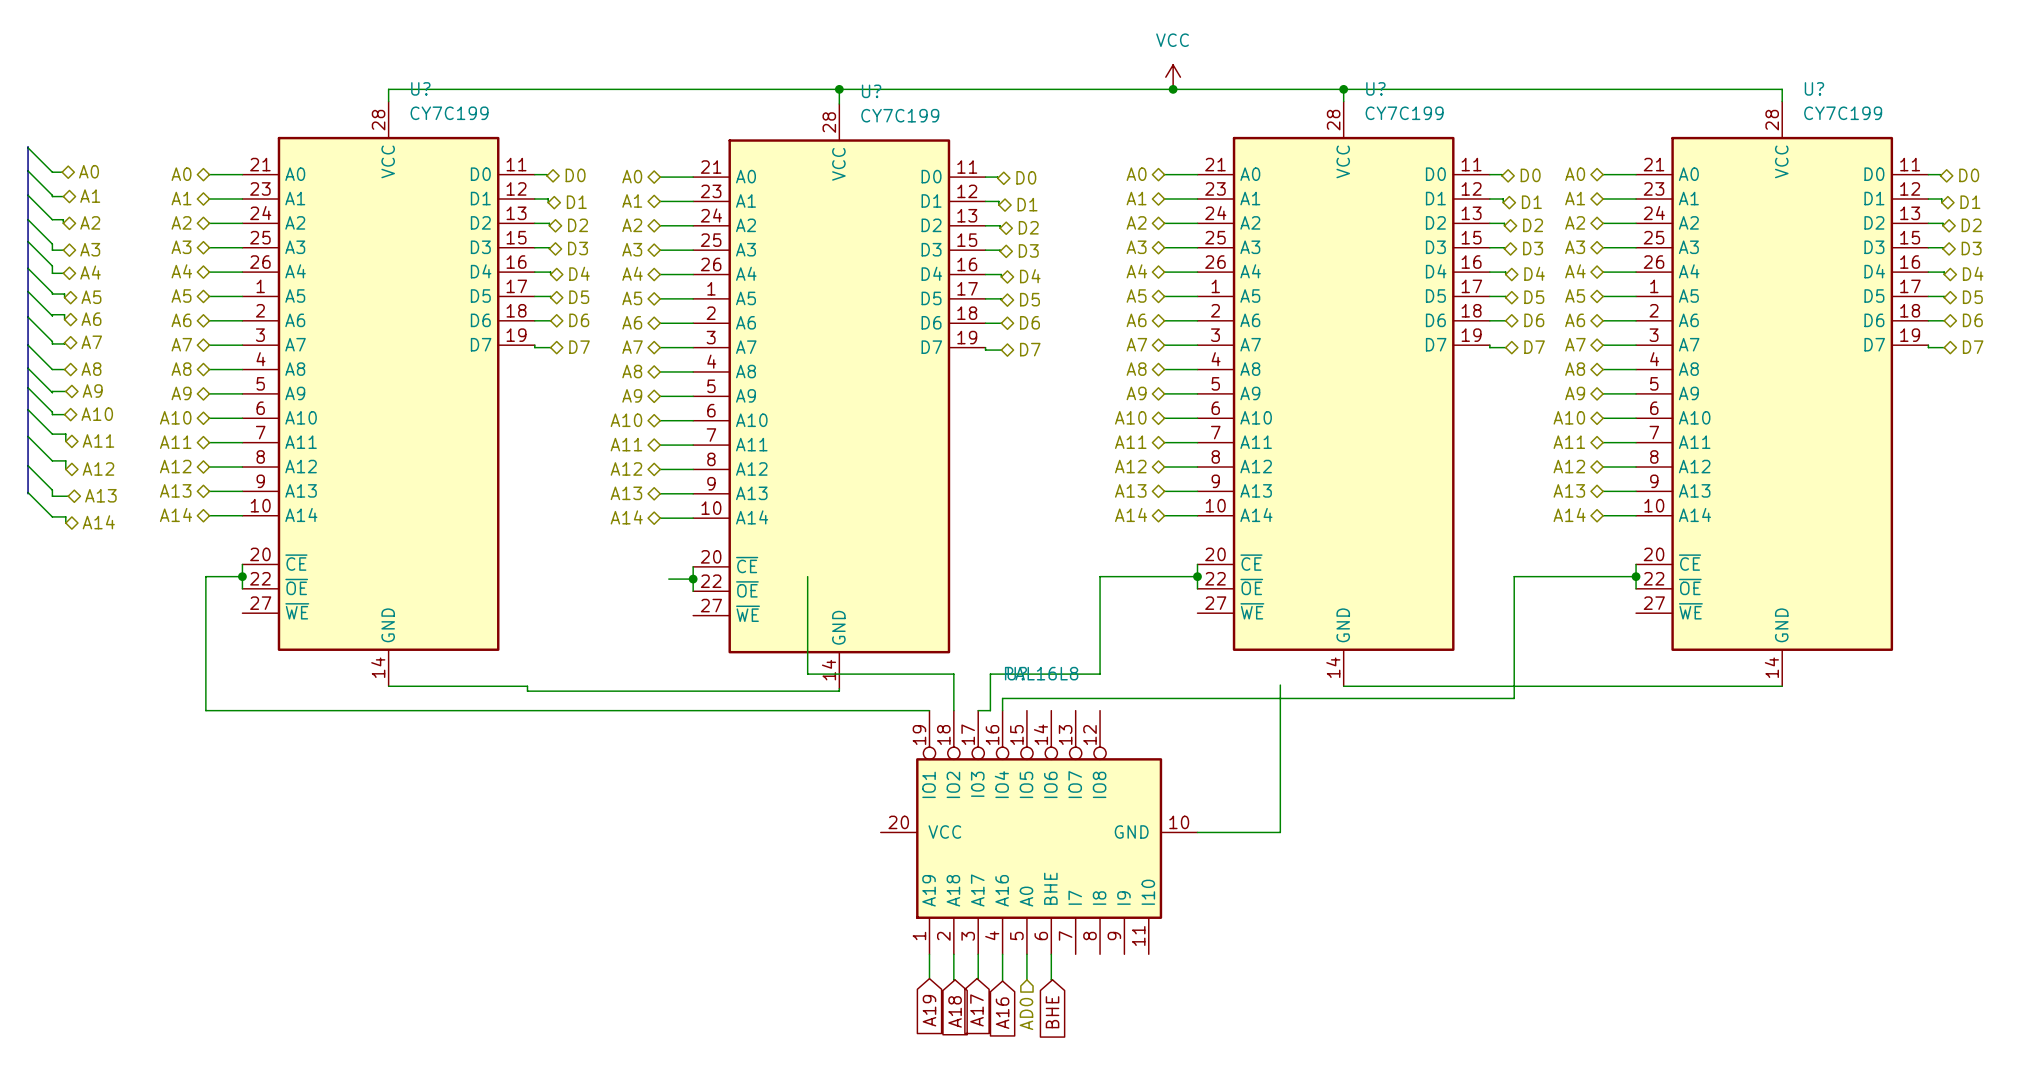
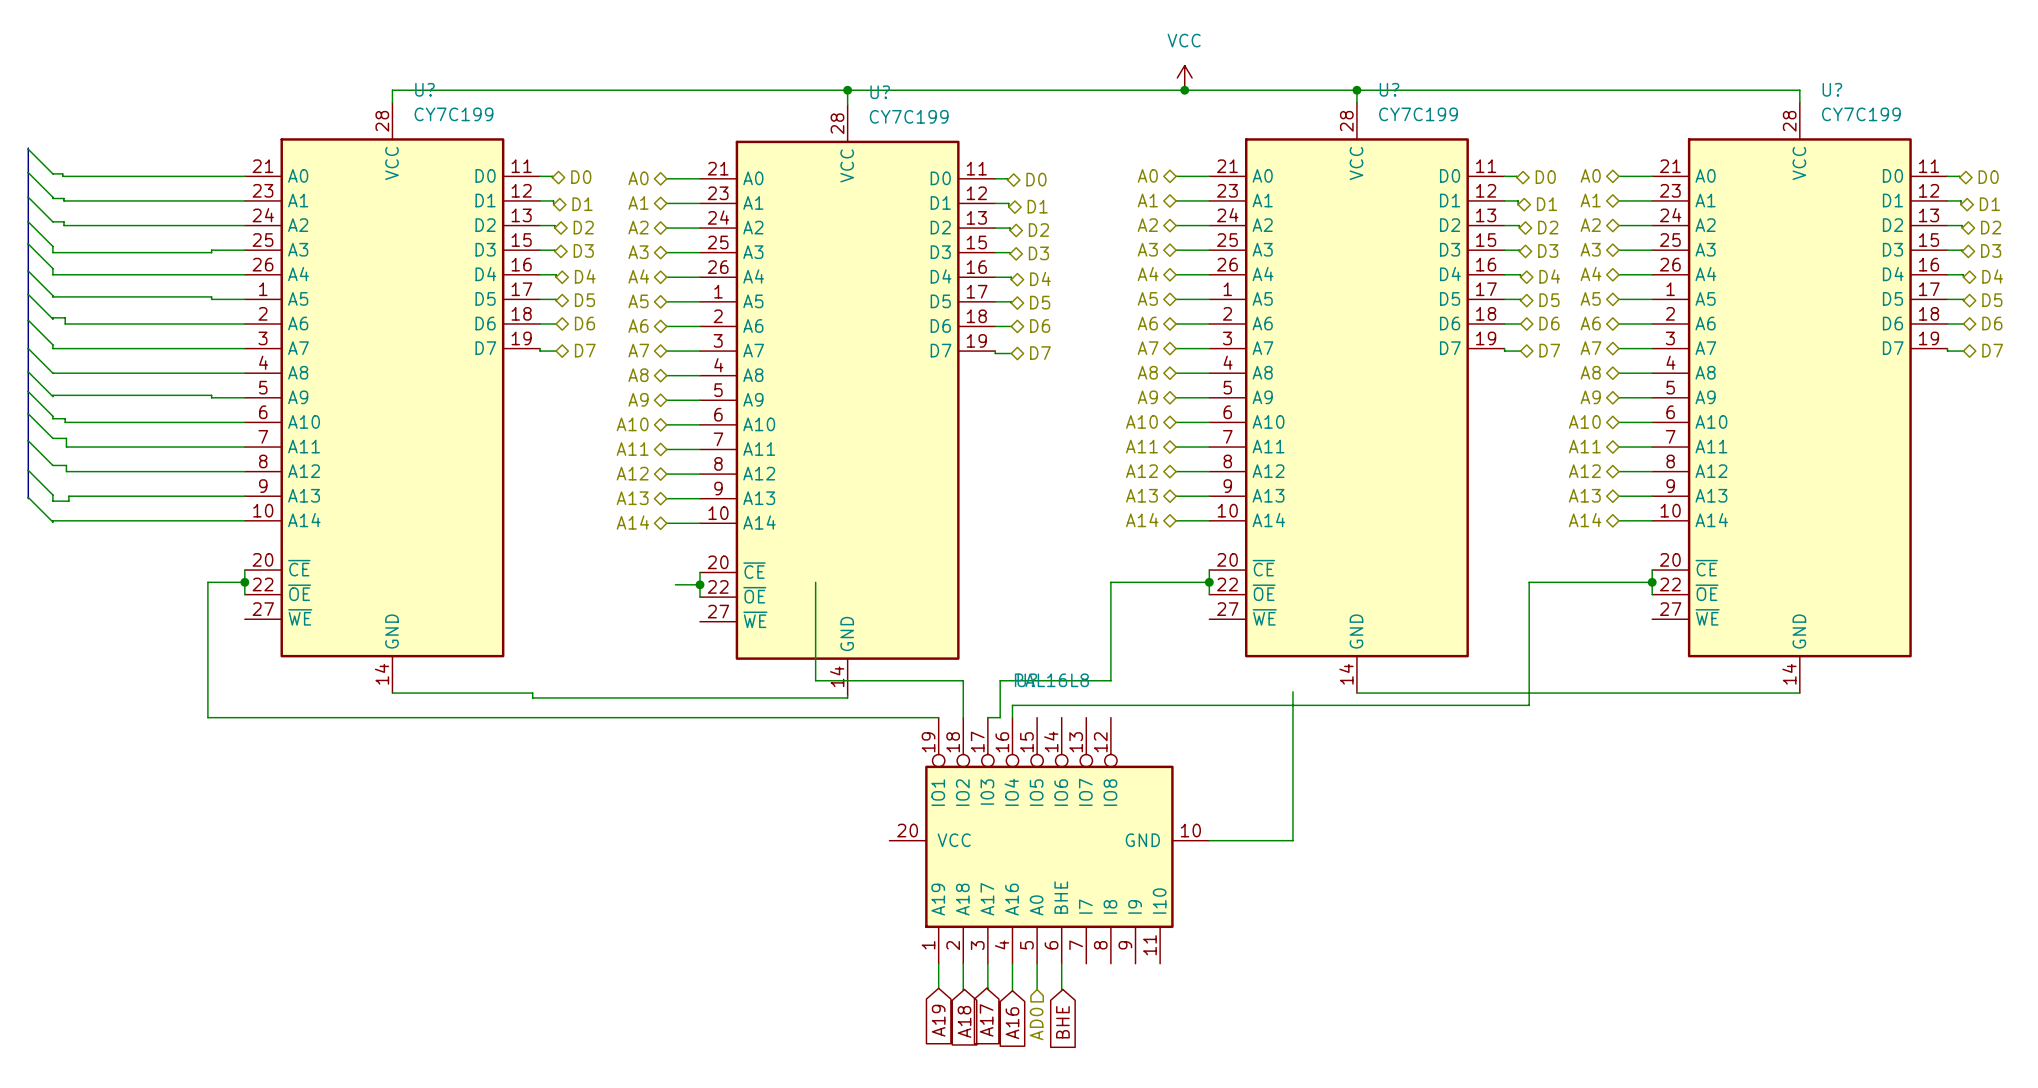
hierarchical label: A0 (89, 171) -> none
wire: none -> (62, 173) (62, 176) (211, 176)
hierarchical label: A0 (181, 174) -> none
wire: none -> (63, 198) (63, 200) (211, 200)
hierarchical label: A1 (90, 196) -> none
hierarchical label: A1 (181, 198) -> none
hierarchical label: A2 (90, 222) -> none
hierarchical label: A2 (181, 222) -> none
wire: none -> (63, 225) (211, 225)
hierarchical label: A3 (181, 247) -> none
wire: none -> (211, 250) (211, 252) (63, 252)
hierarchical label: A3 (90, 249) -> none
hierarchical label: A4 (181, 271) -> none
wire: (52, 272) (63, 273) -> (52, 274) (211, 274)
hierarchical label: A4 (90, 272) -> none
wire: (64, 294) (64, 297) -> (65, 296) (211, 296) (211, 299)
hierarchical label: A5 (181, 296) -> none
hierarchical label: A5 (91, 297) -> none
wire: none -> (65, 322) (211, 323)
hierarchical label: A6 (91, 319) -> none
hierarchical label: A6 (181, 320) -> none
wire: (64, 342) (52, 343) -> (211, 348) (52, 347)
hierarchical label: A7 (91, 342) -> none
hierarchical label: A7 (181, 344) -> none
wire: none -> (65, 373) (211, 373)
hierarchical label: A8 (91, 369) -> none
hierarchical label: A8 (181, 369) -> none
wire: none -> (66, 395) (211, 395) (211, 397)
hierarchical label: A9 (92, 391) -> none
hierarchical label: A9 (181, 393) -> none
wire: none -> (65, 418) (65, 422) (211, 422)
hierarchical label: A10 (97, 414) -> none
hierarchical label: A10 (175, 417) -> none
hierarchical label: A11 (98, 440) -> none
wire: none -> (66, 445) (211, 447)
hierarchical label: A11 (175, 442) -> none
hierarchical label: A12 (175, 466) -> none
wire: (65, 467) (65, 469) -> (66, 471) (211, 471)
hierarchical label: A12 (98, 468) -> none
hierarchical label: A13 (175, 490) -> none
wire: none -> (211, 496) (68, 496) (68, 501)
hierarchical label: A13 (100, 495) -> none
hierarchical label: A14 (175, 514) -> none
wire: (52, 516) (65, 516) (65, 523) -> (52, 522) (211, 520)
hierarchical label: A14 (98, 522) -> none

